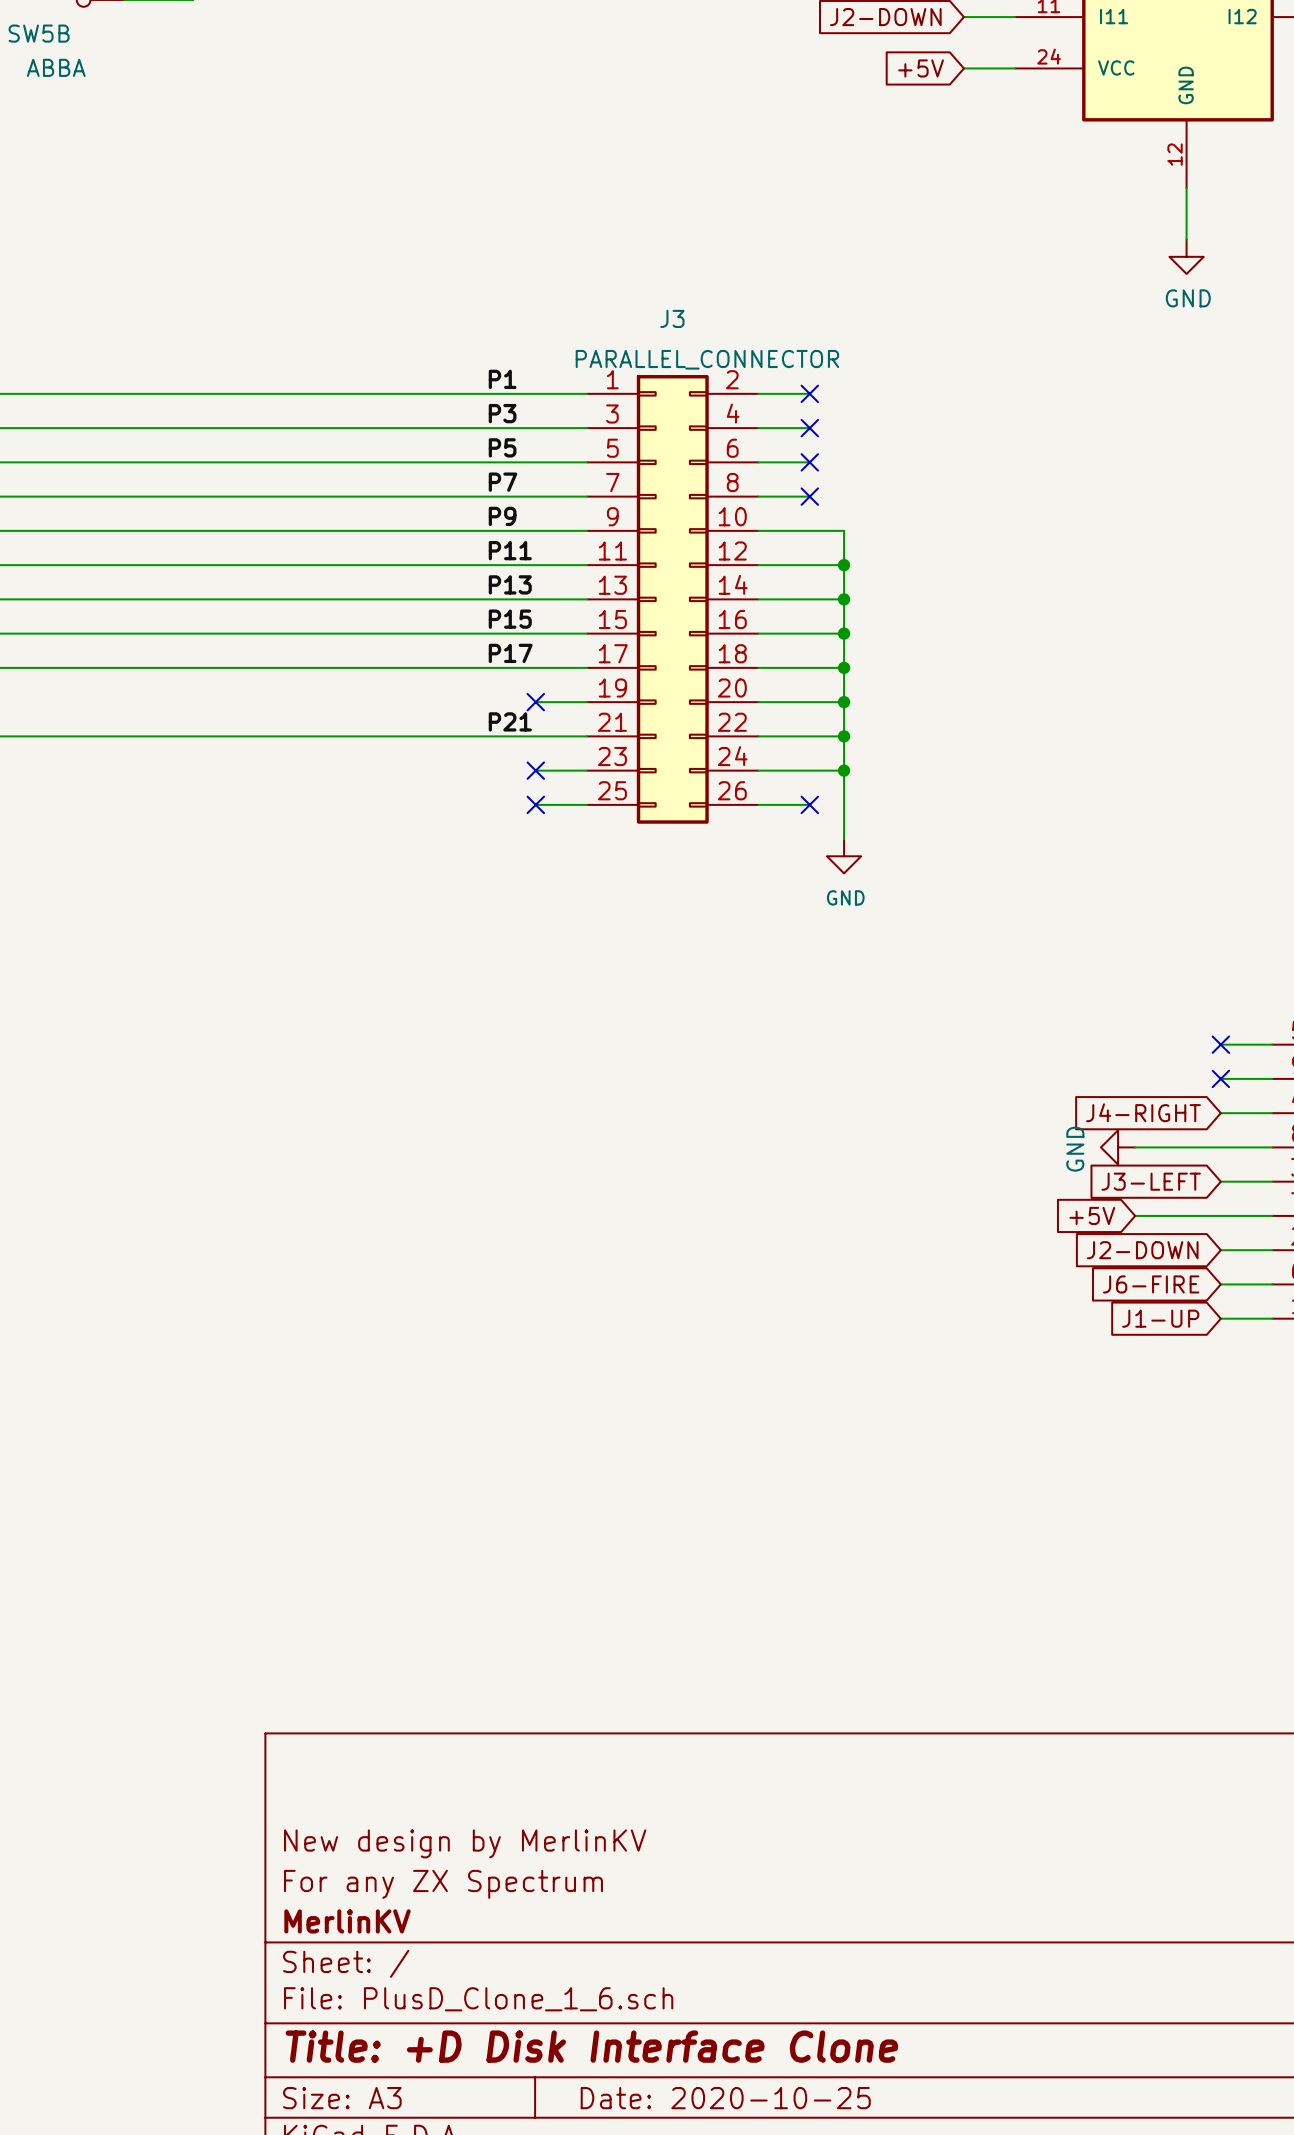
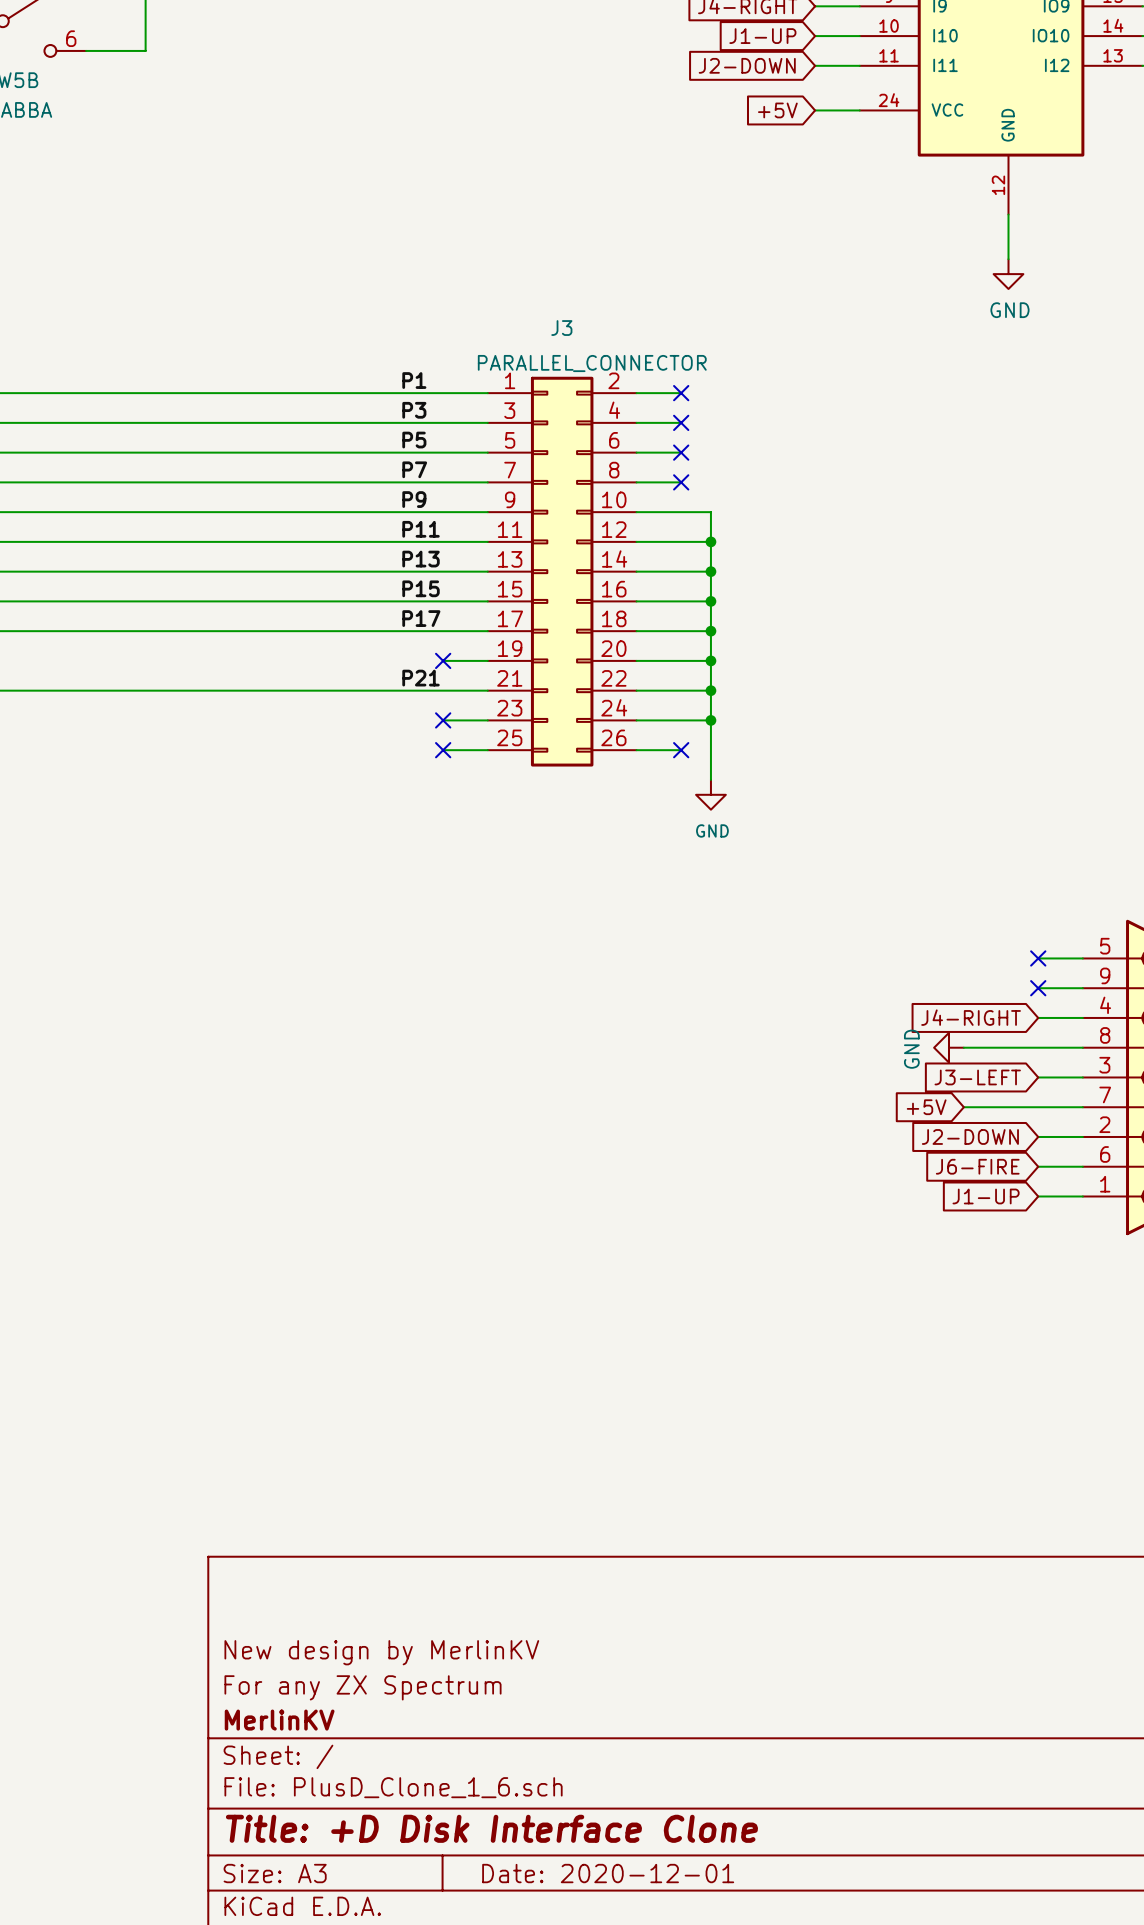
title block: Date: 2020-10-25 (725, 2098) -> Date: 2020-12-01 (608, 1873)

